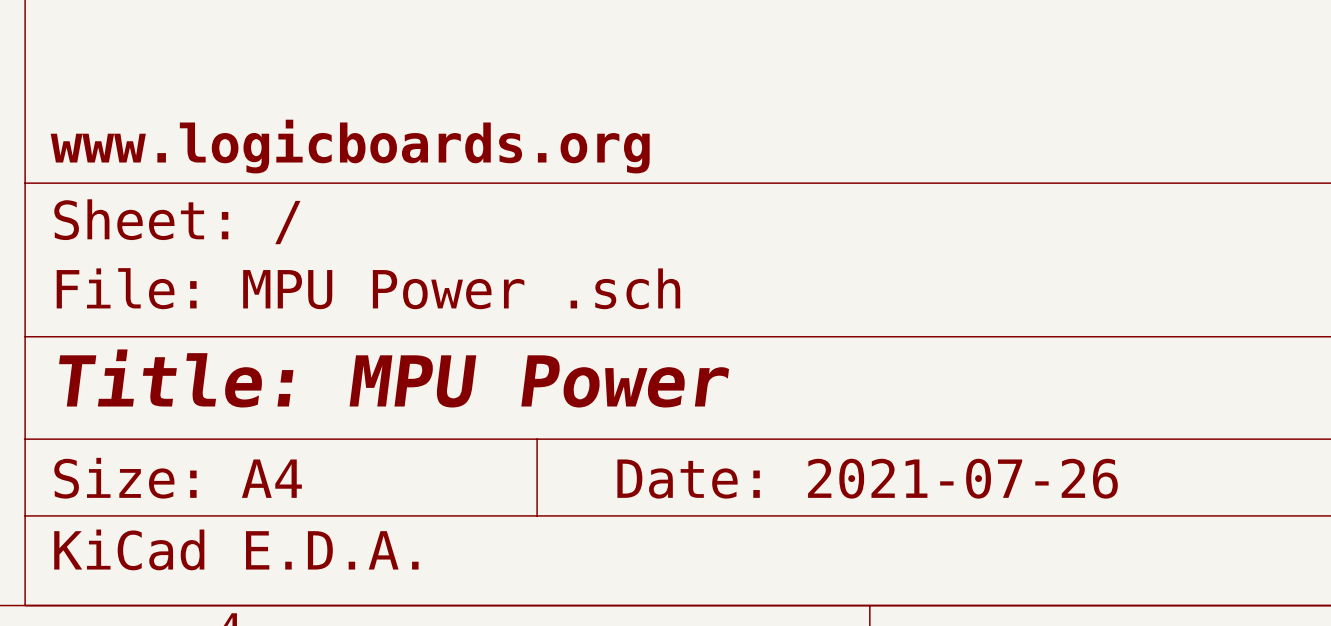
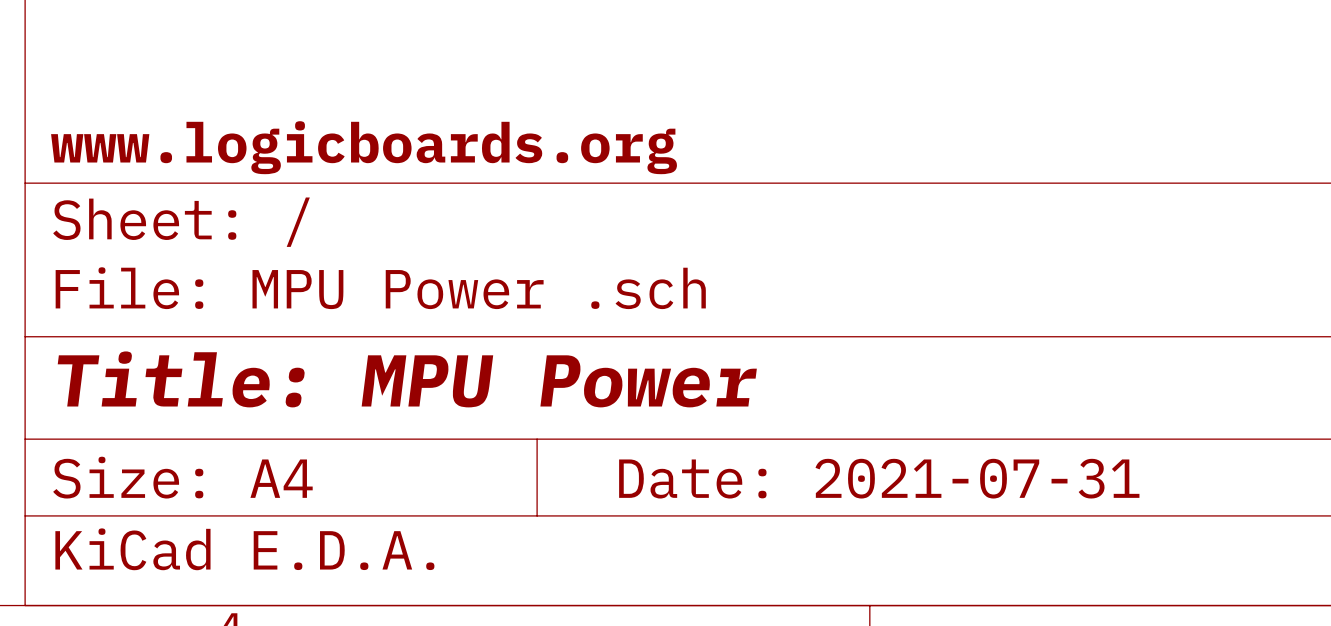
title block: Date: 2021-07-26 (867, 478) -> Date: 2021-07-31 (879, 478)

